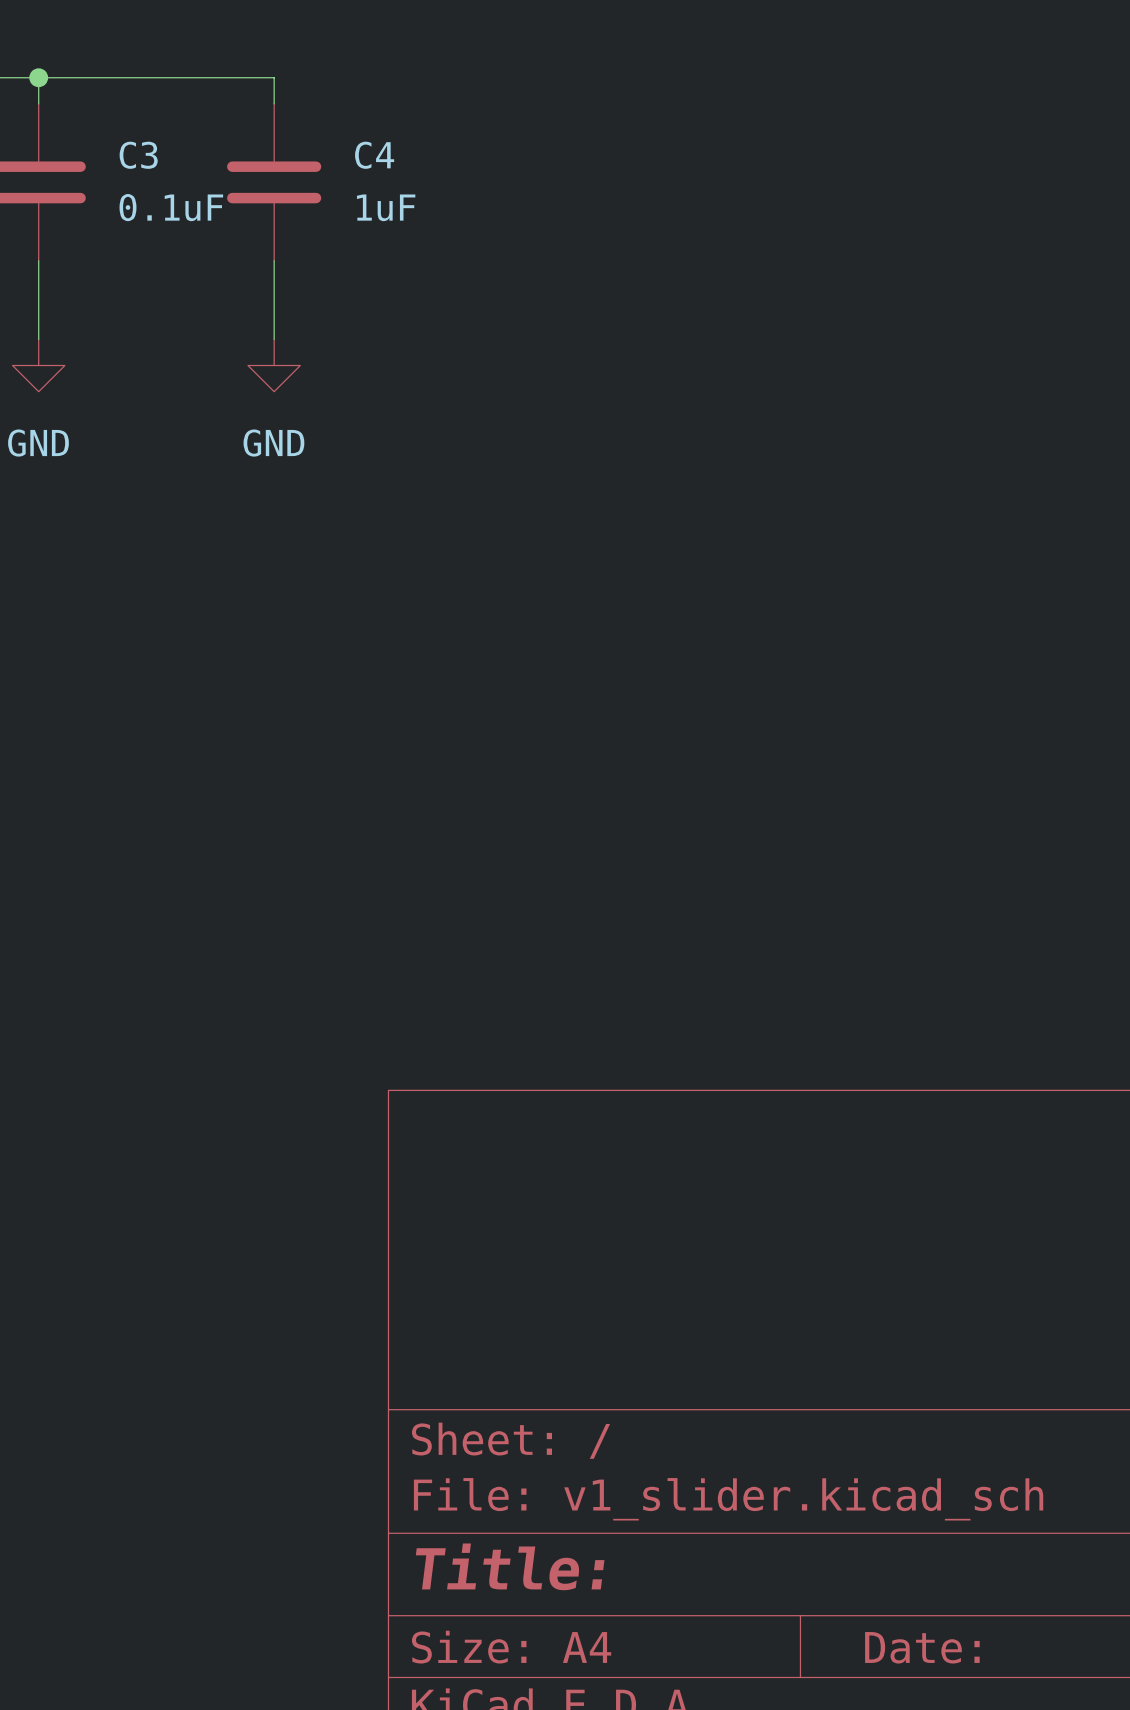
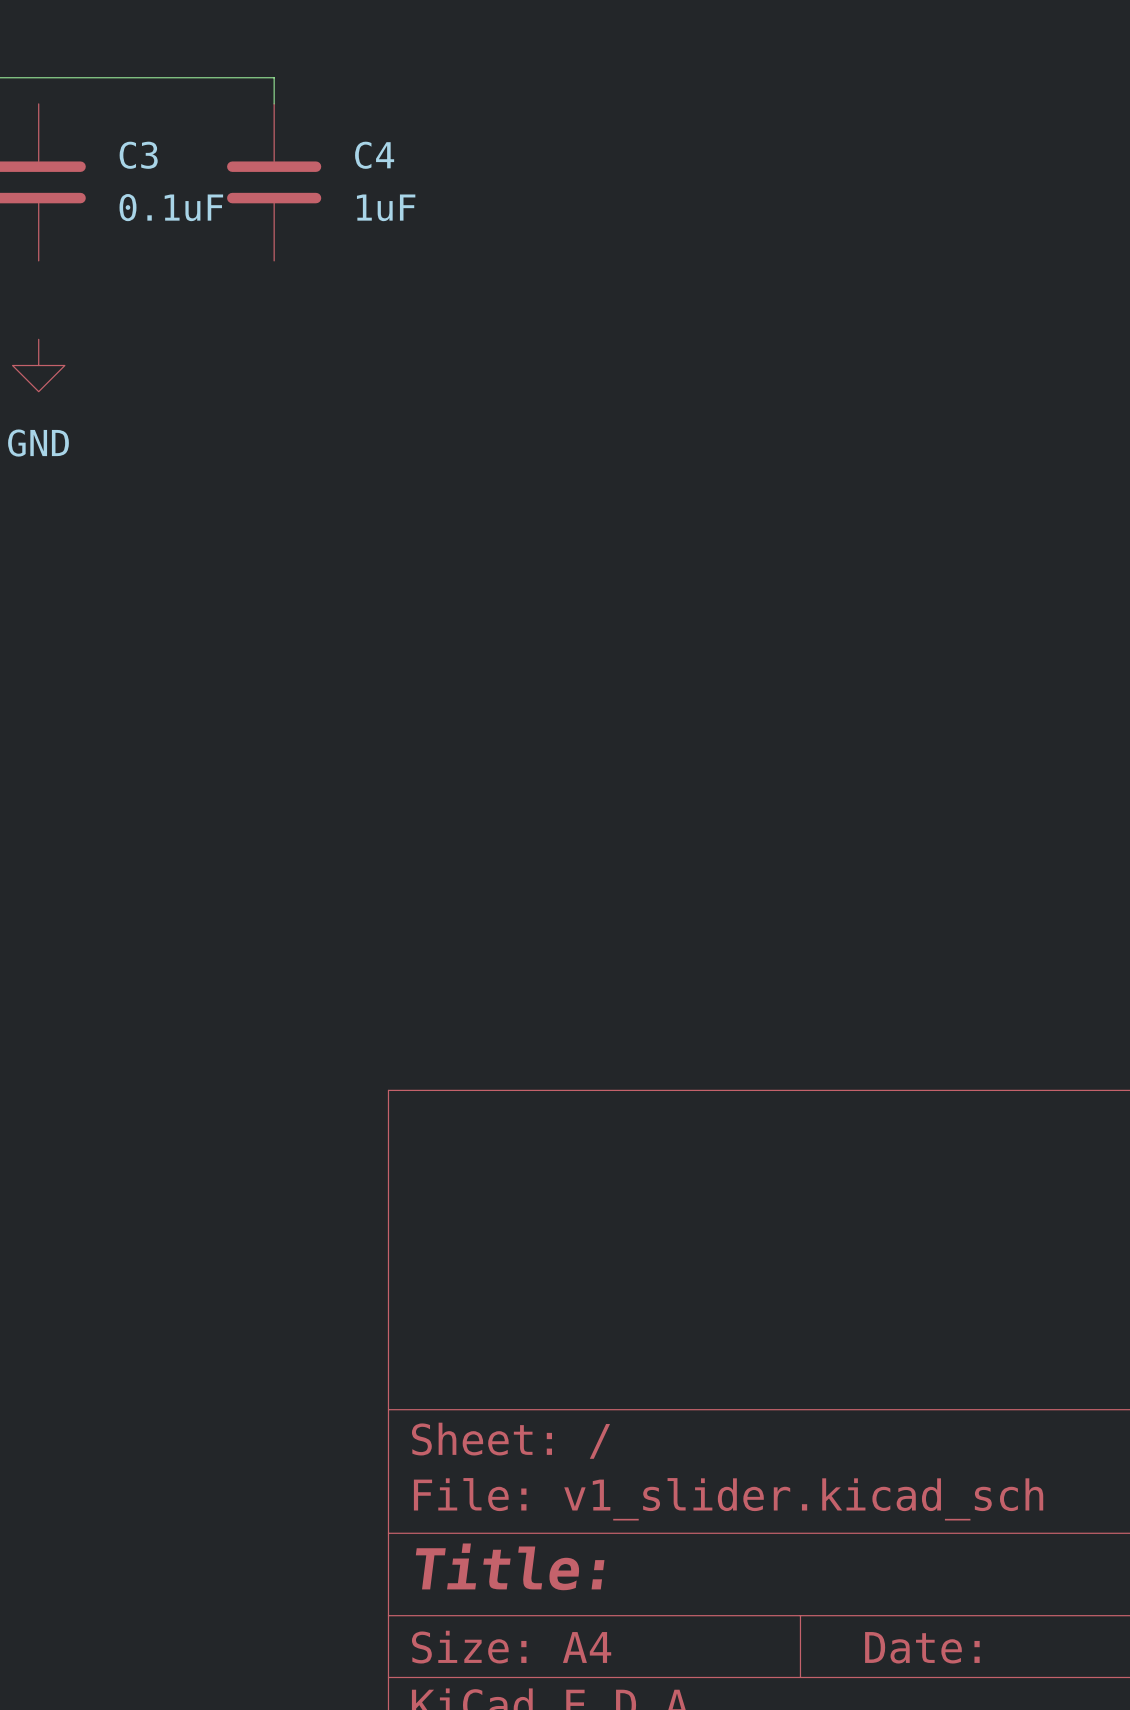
wire: (38, 77) (38, 103) -> none
junction: (38, 77) -> none
wire: (38, 260) (38, 339) -> none
wire: (274, 260) (274, 339) -> none
power symbol: GND (274, 365) -> none

